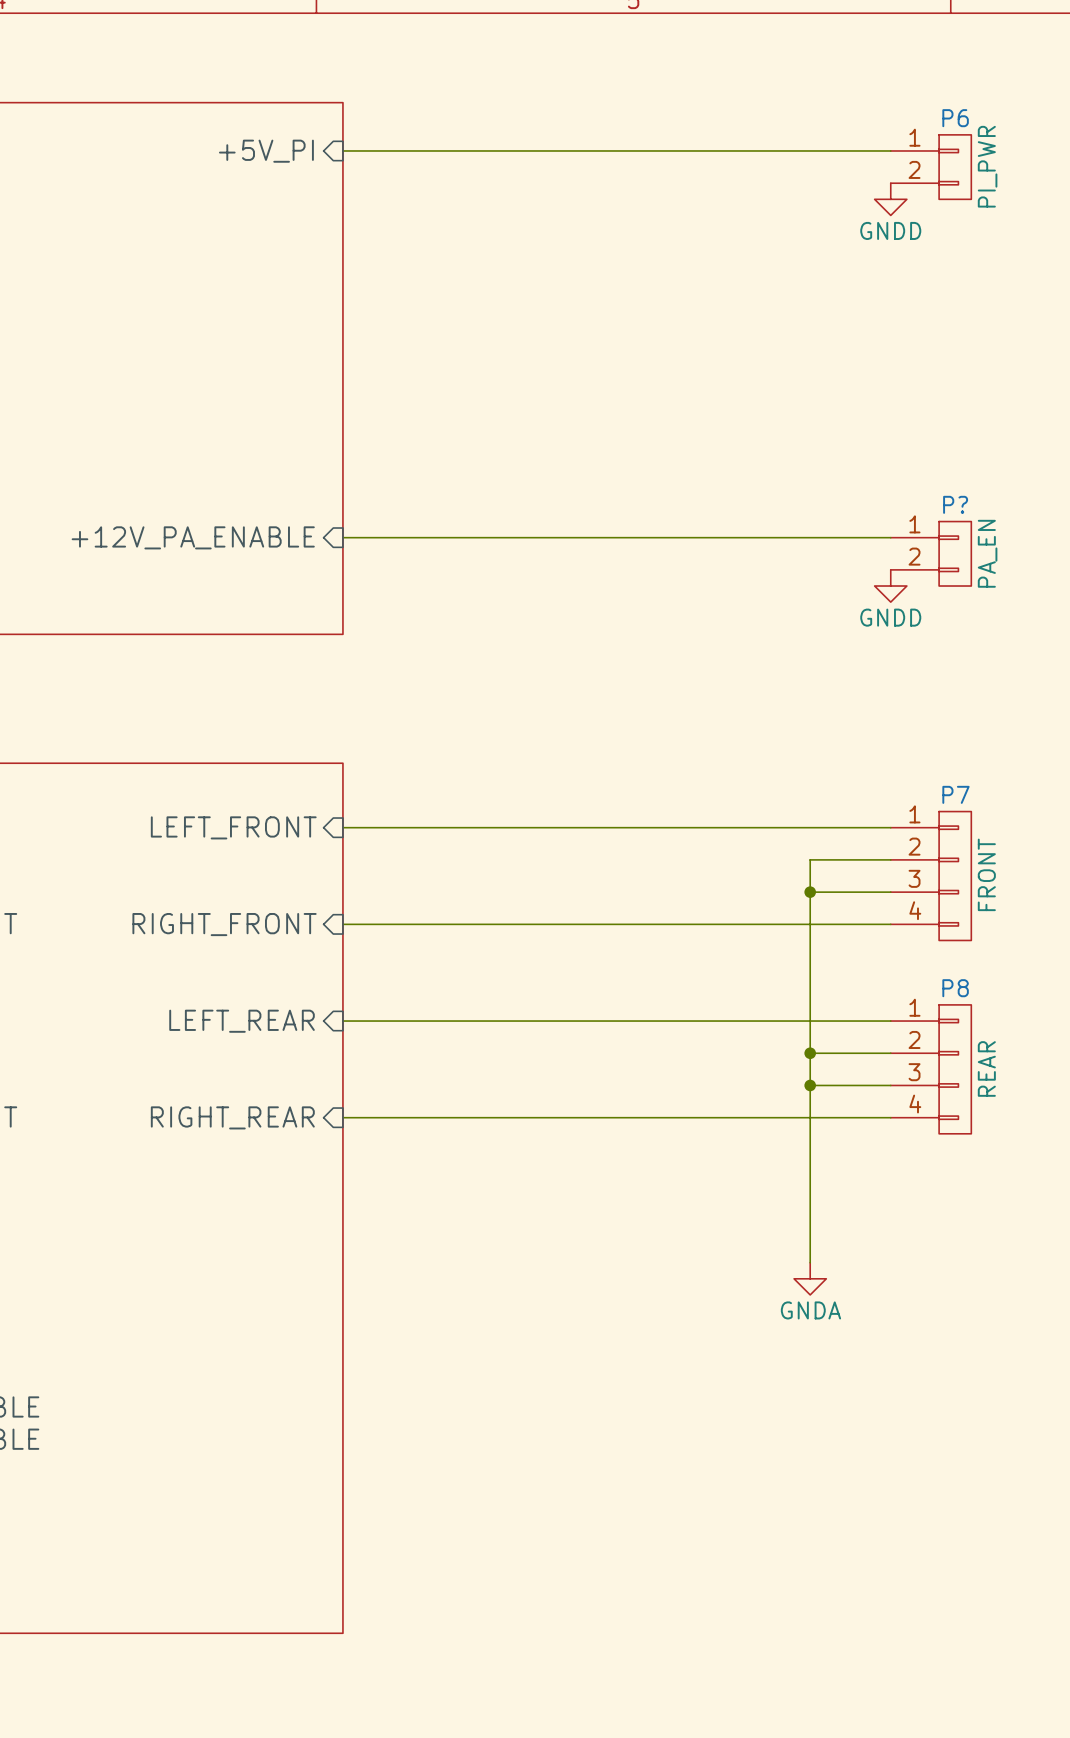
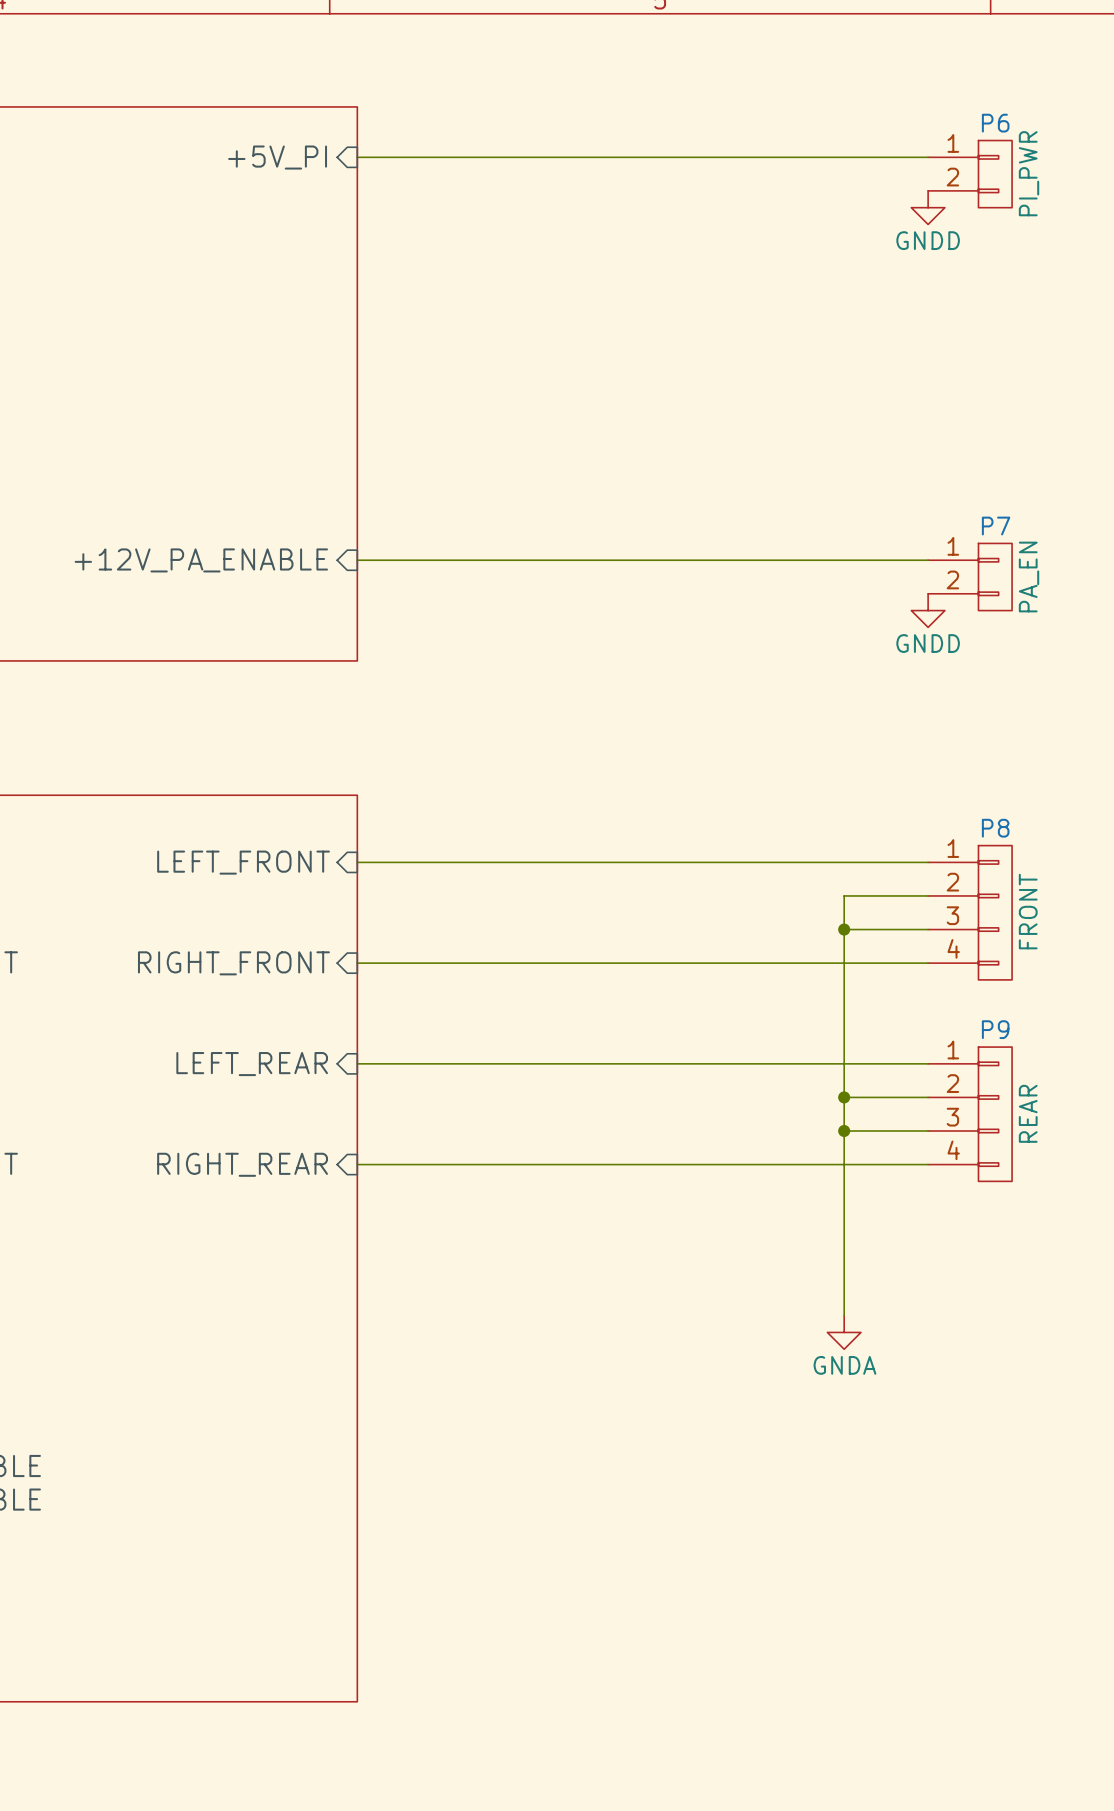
P? name: P? (955, 504) -> P7 (996, 526)
P7 name: P7 (955, 794) -> P8 (995, 828)
P8 name: P8 (955, 988) -> P9 (995, 1029)

